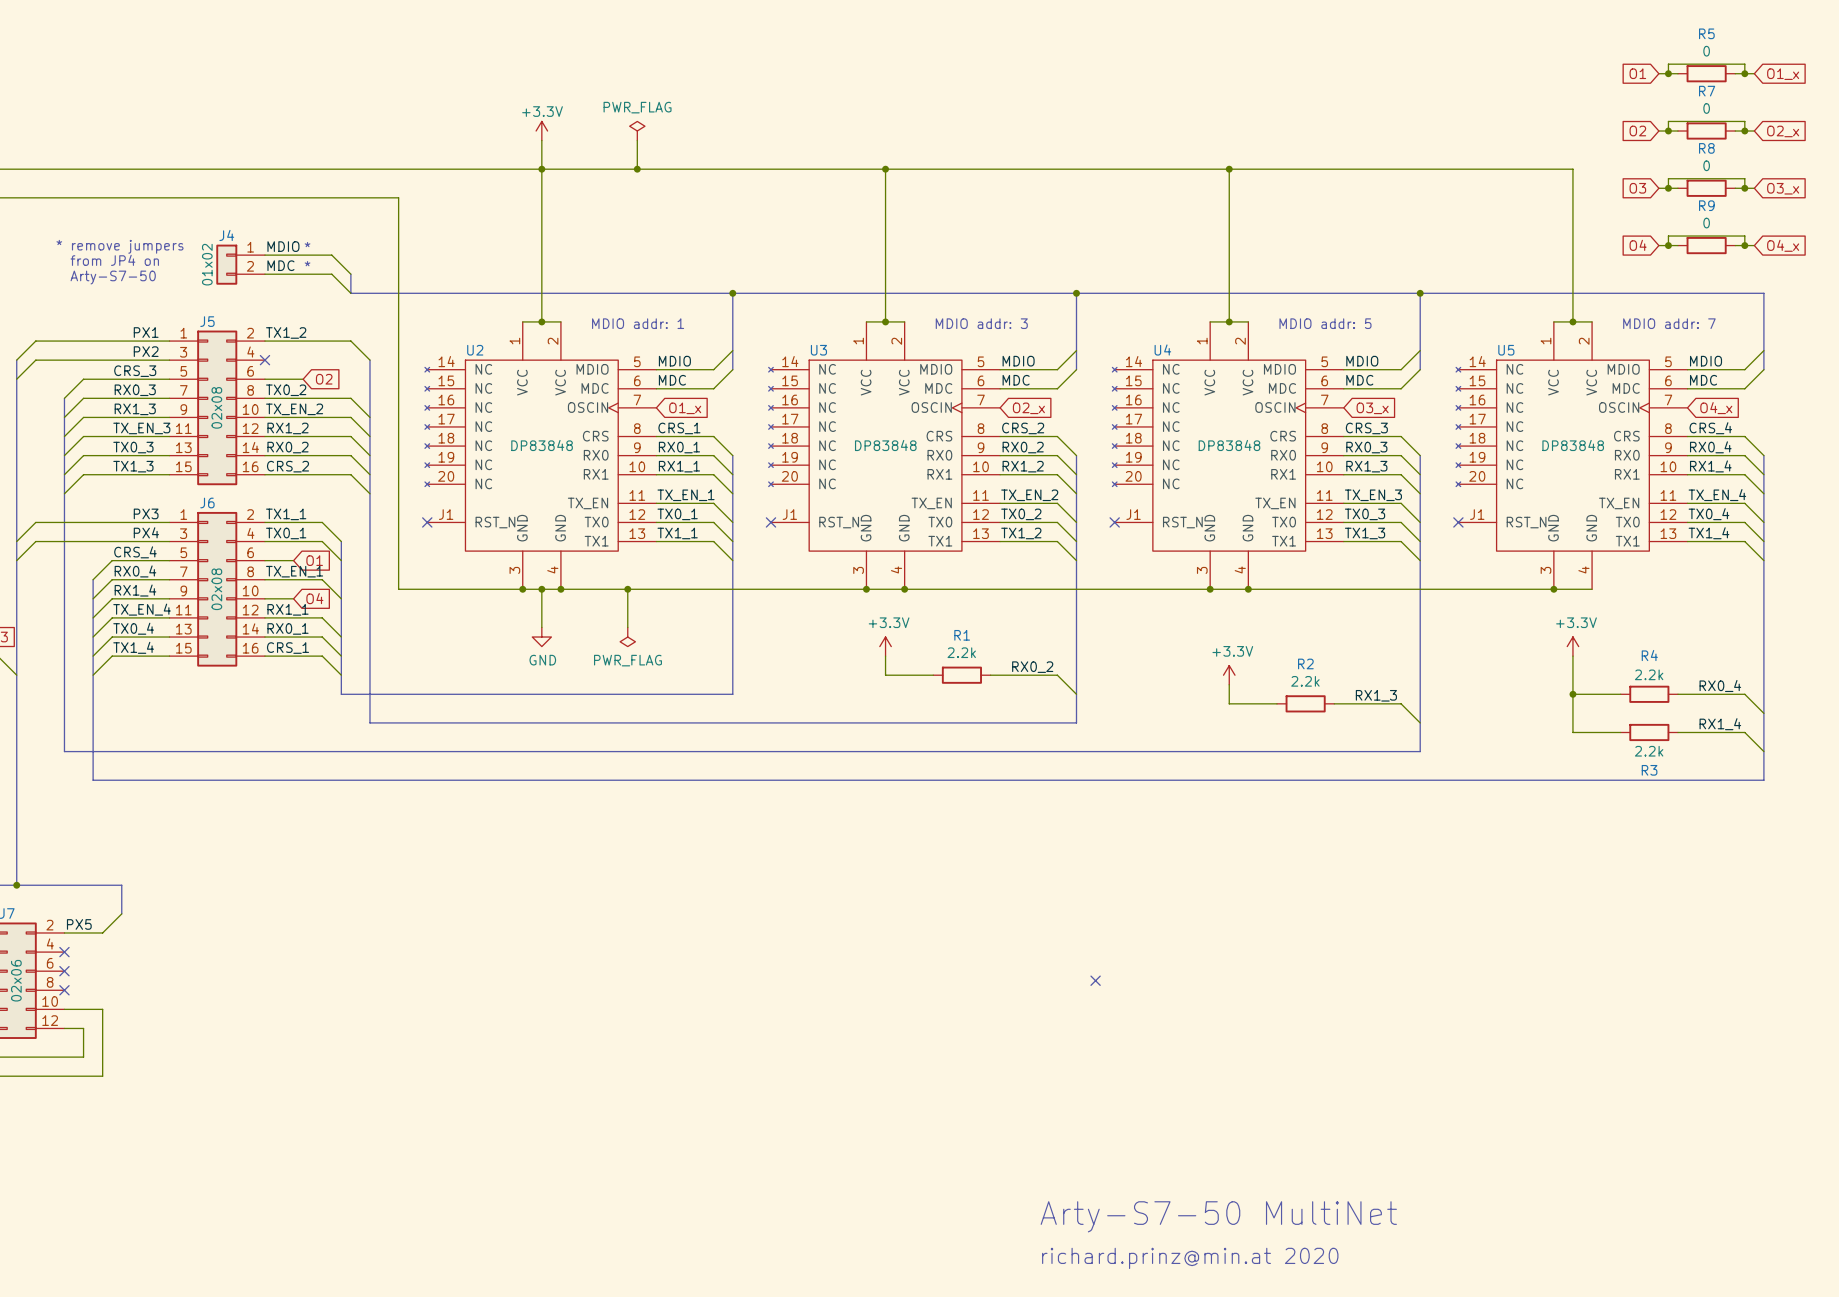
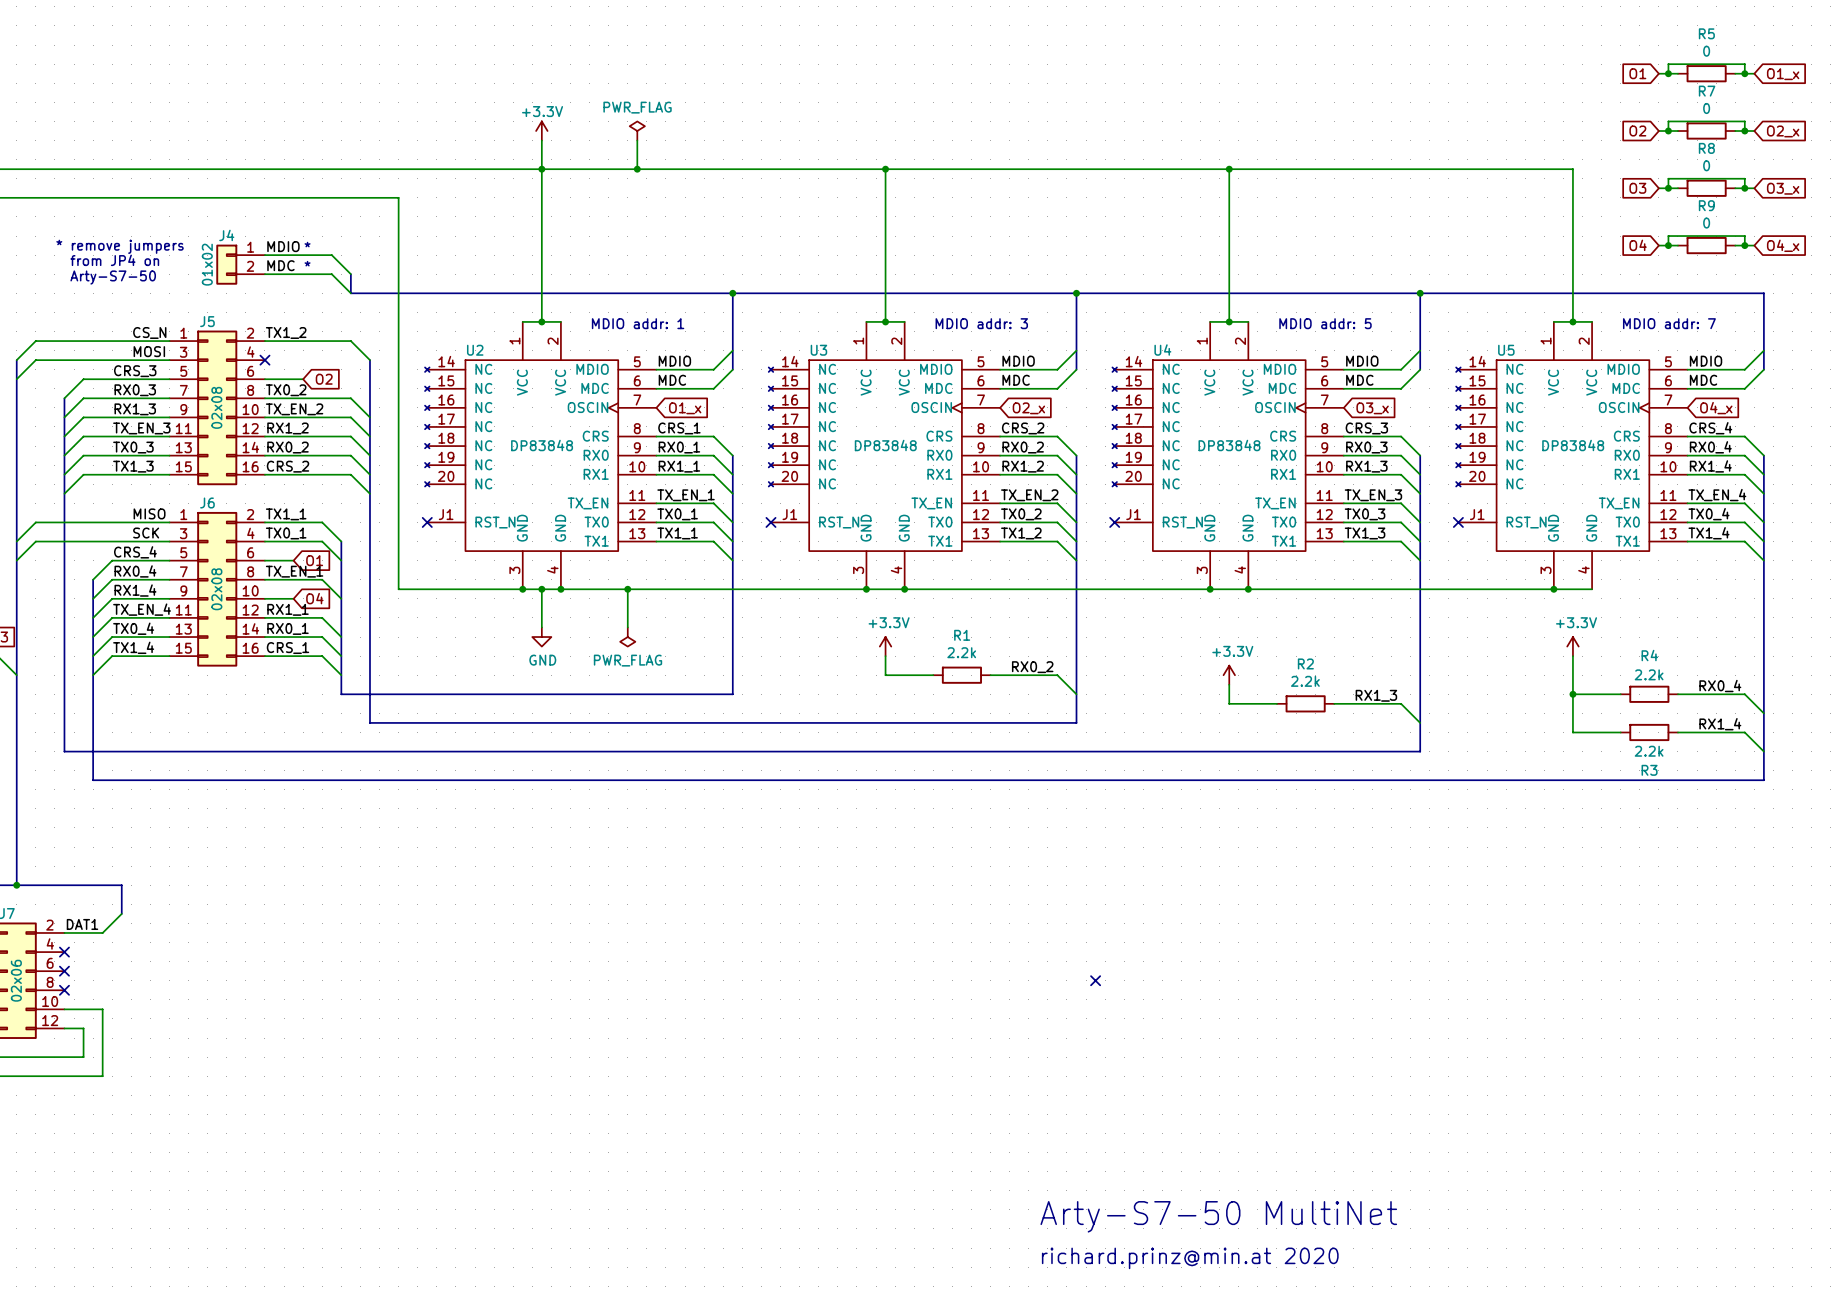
label: PX1 (146, 332) -> CS_N (149, 332)
label: PX2 (146, 351) -> MOSI (149, 351)
label: PX3 (146, 513) -> MISO (149, 513)
label: PX4 (146, 532) -> SCK (146, 533)
label: PX5 (79, 924) -> DAT1 (82, 924)

